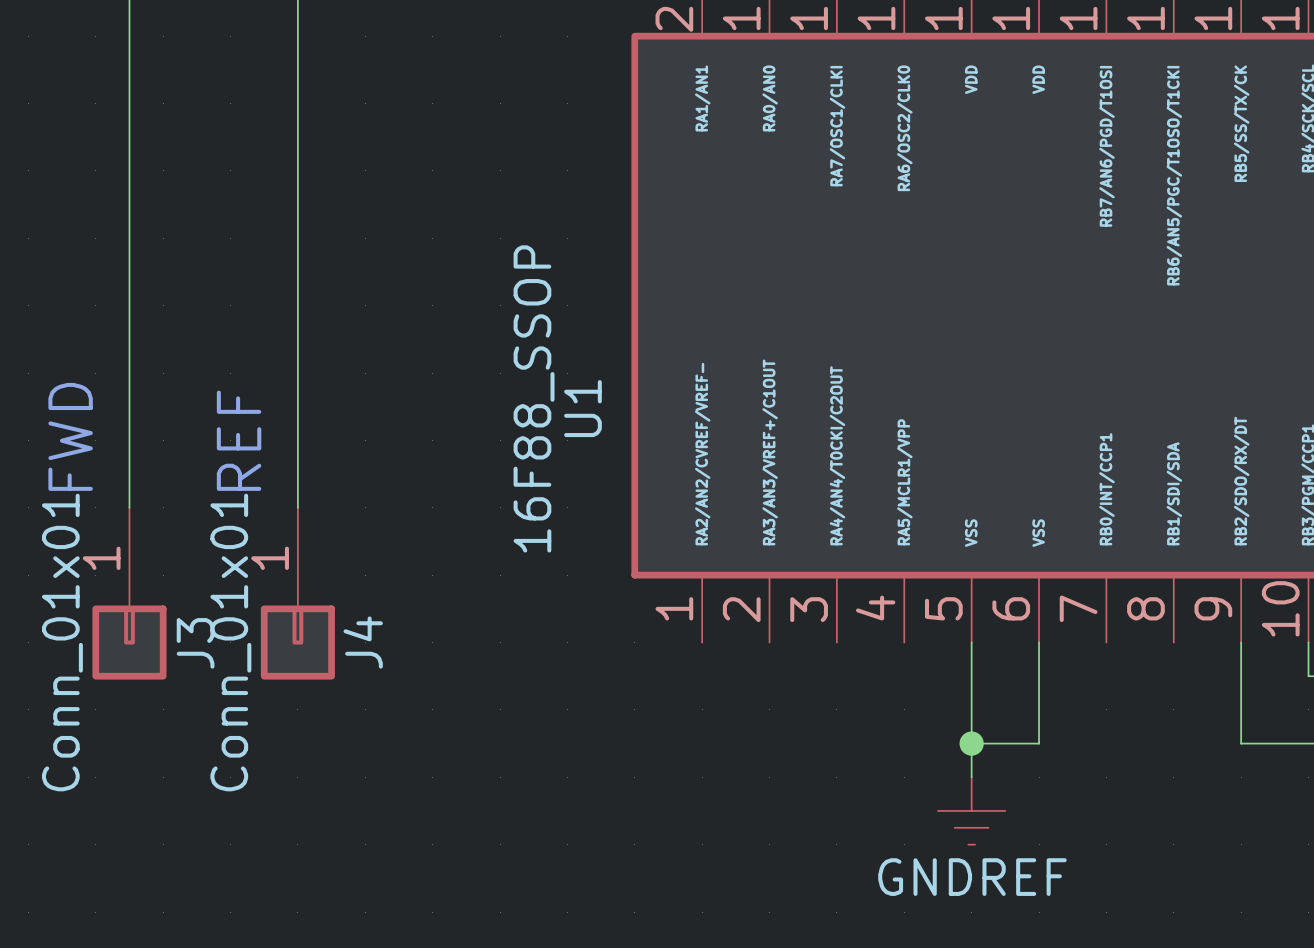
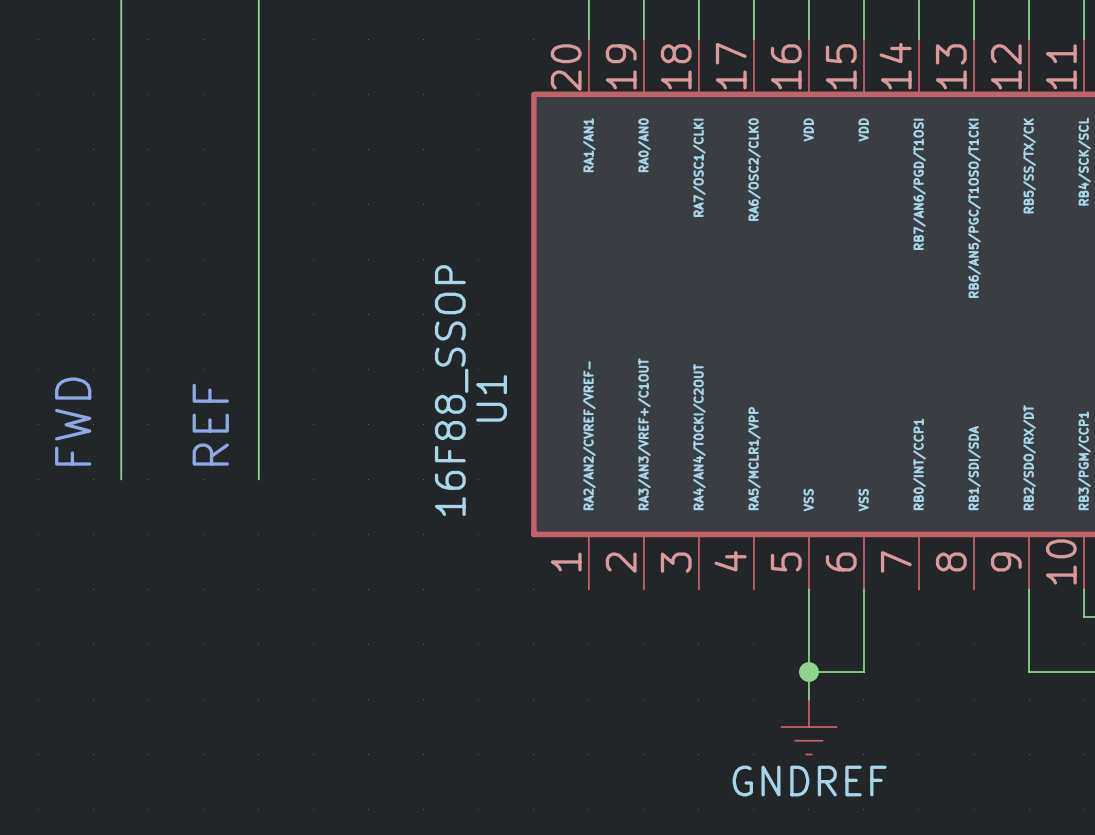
J3: Conn_01x01 (129, 593) -> none
J4: Conn_01x01 (297, 593) -> none

